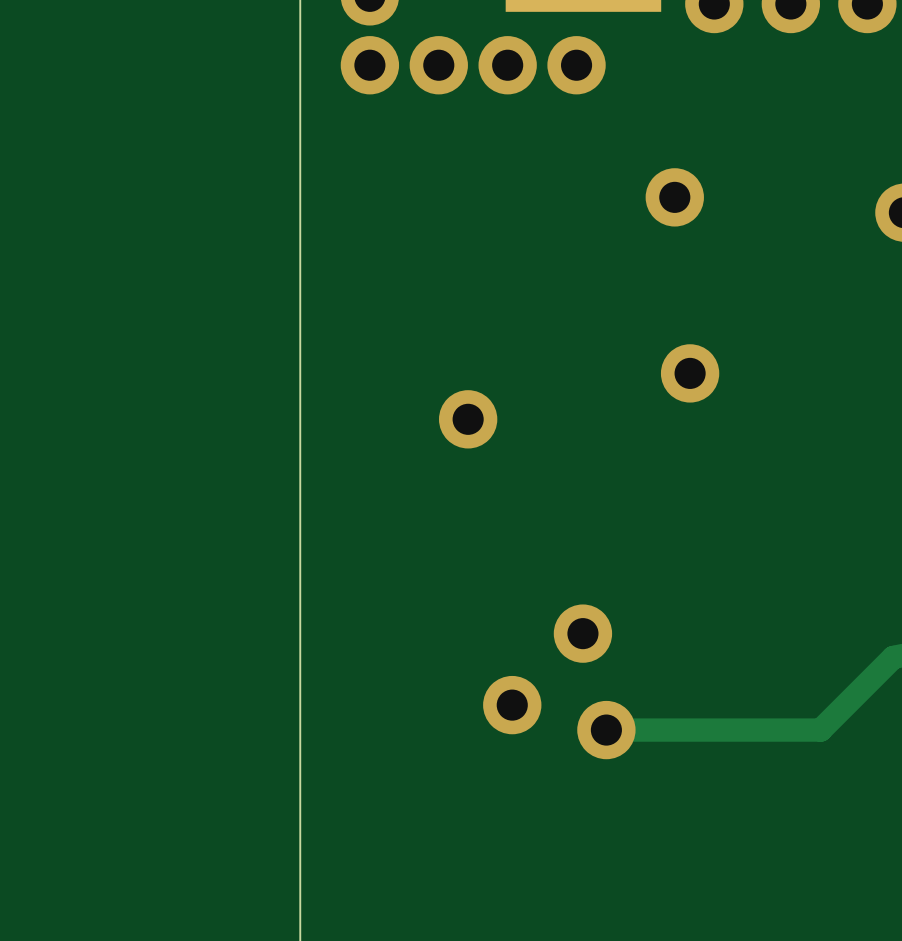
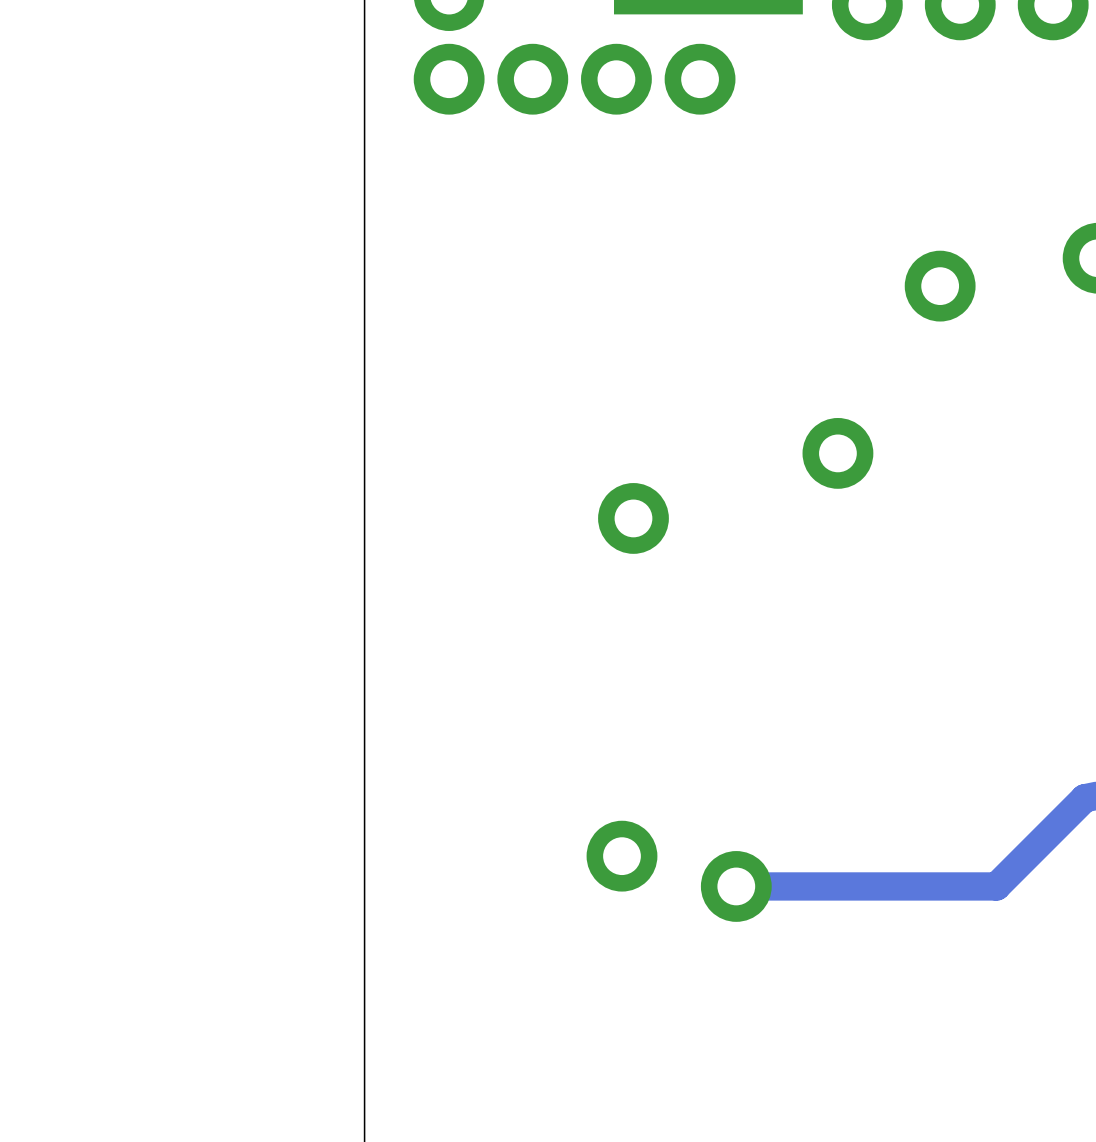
via position: (674, 197) -> (940, 286)
via position: (468, 419) -> (633, 518)
via: (582, 633) -> none

